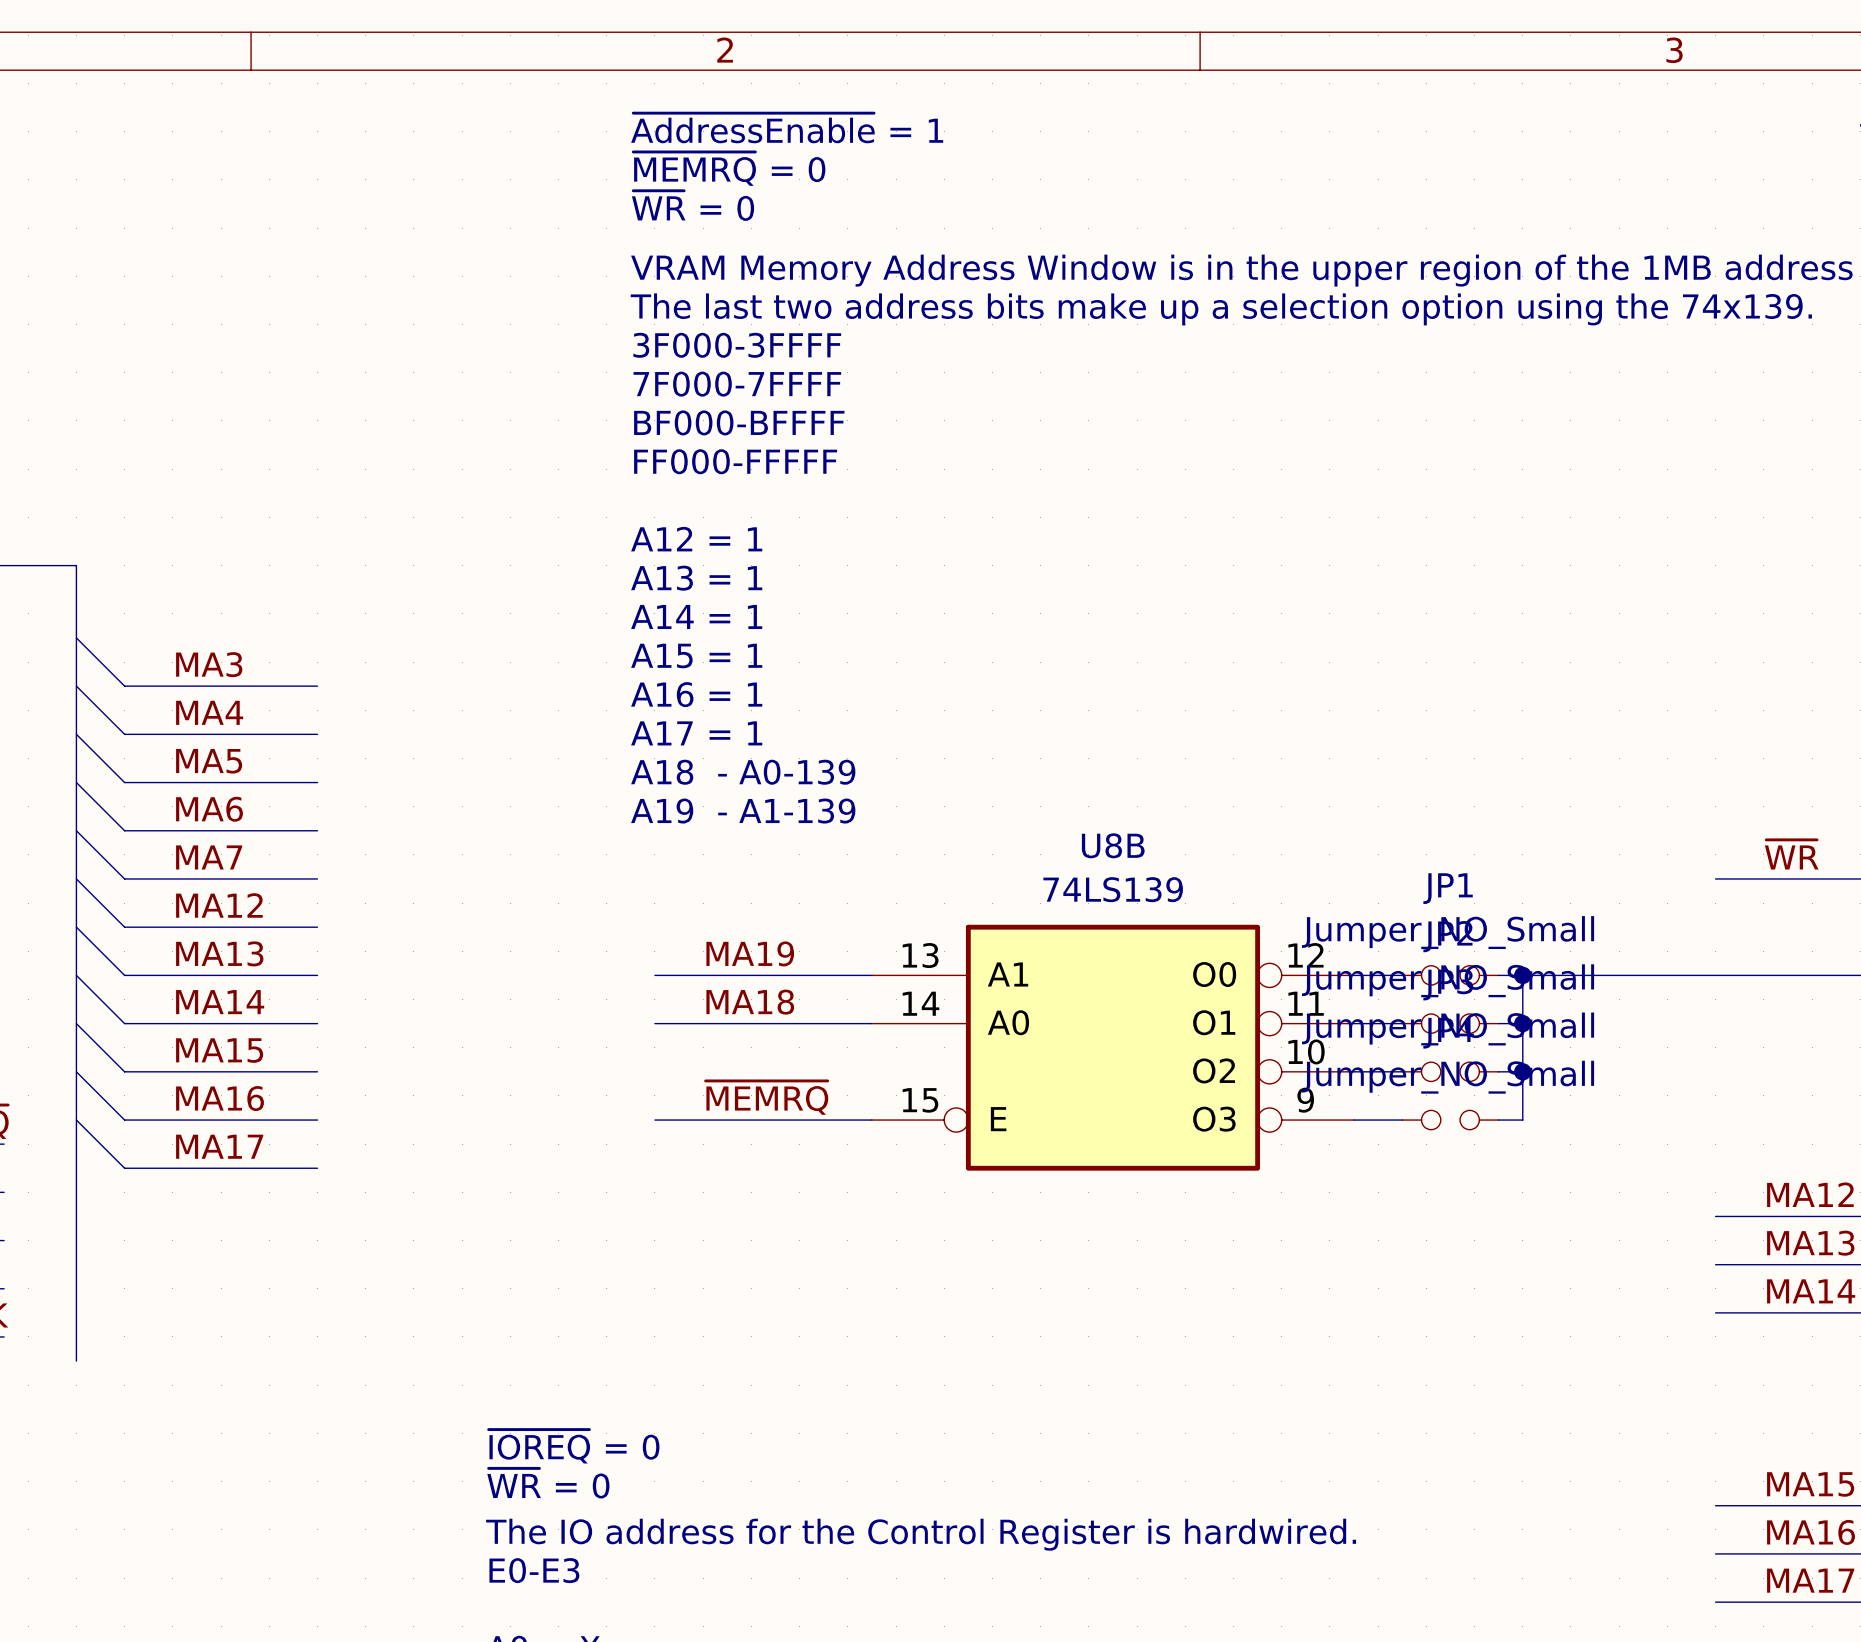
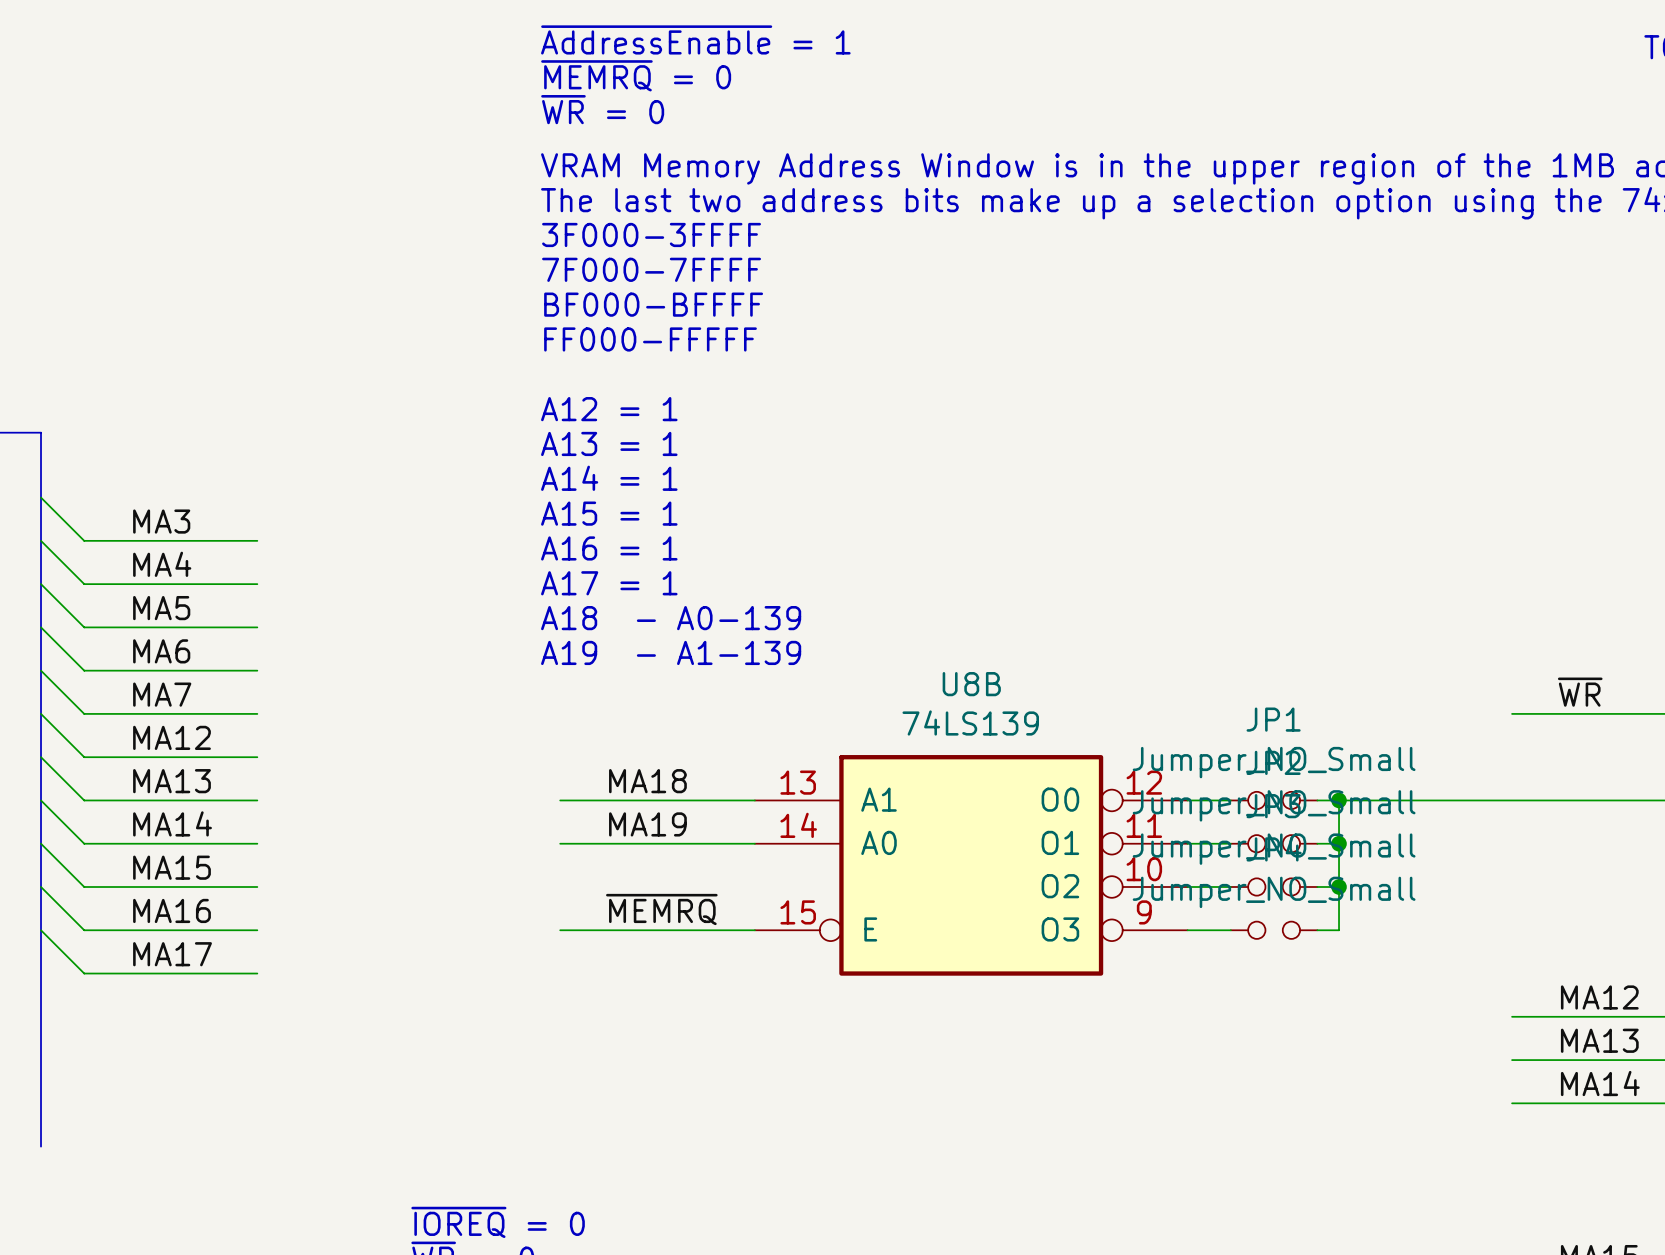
label: MA19 (750, 953) -> MA18 (647, 781)
label: MA18 (750, 1002) -> MA19 (647, 824)

